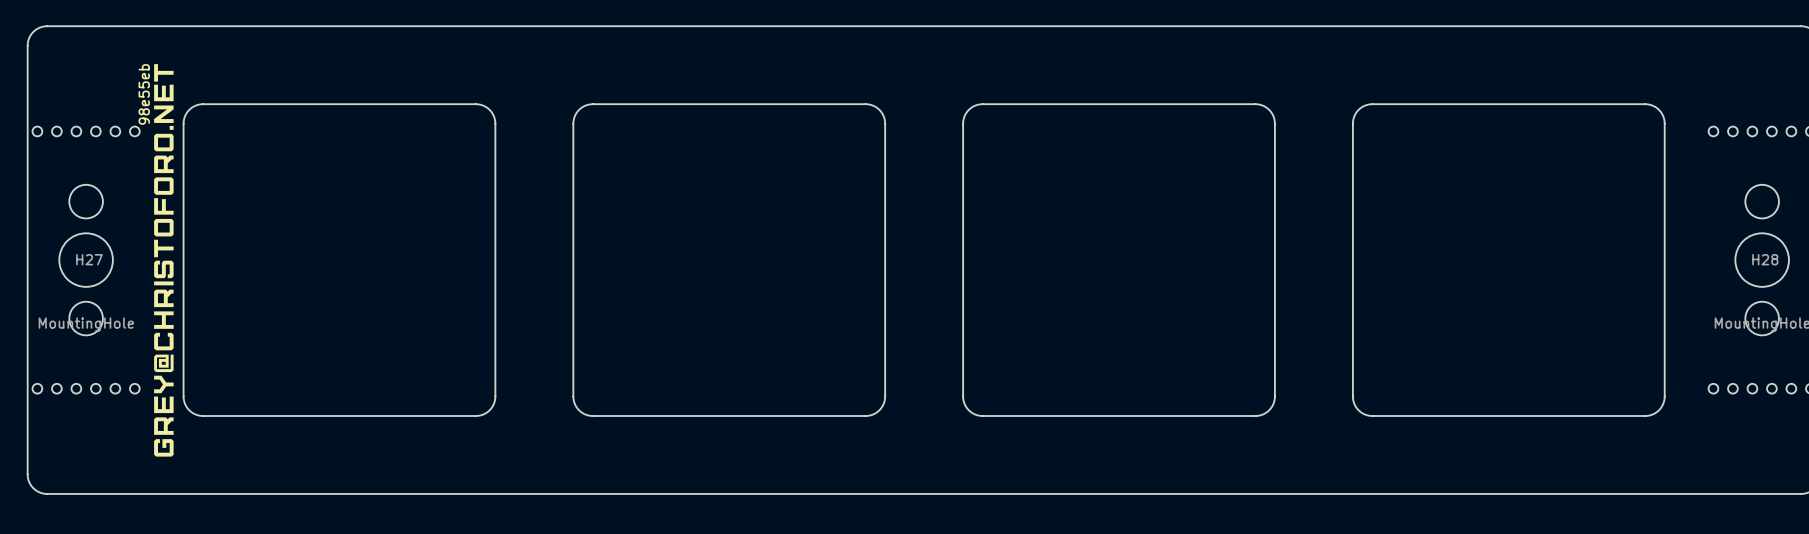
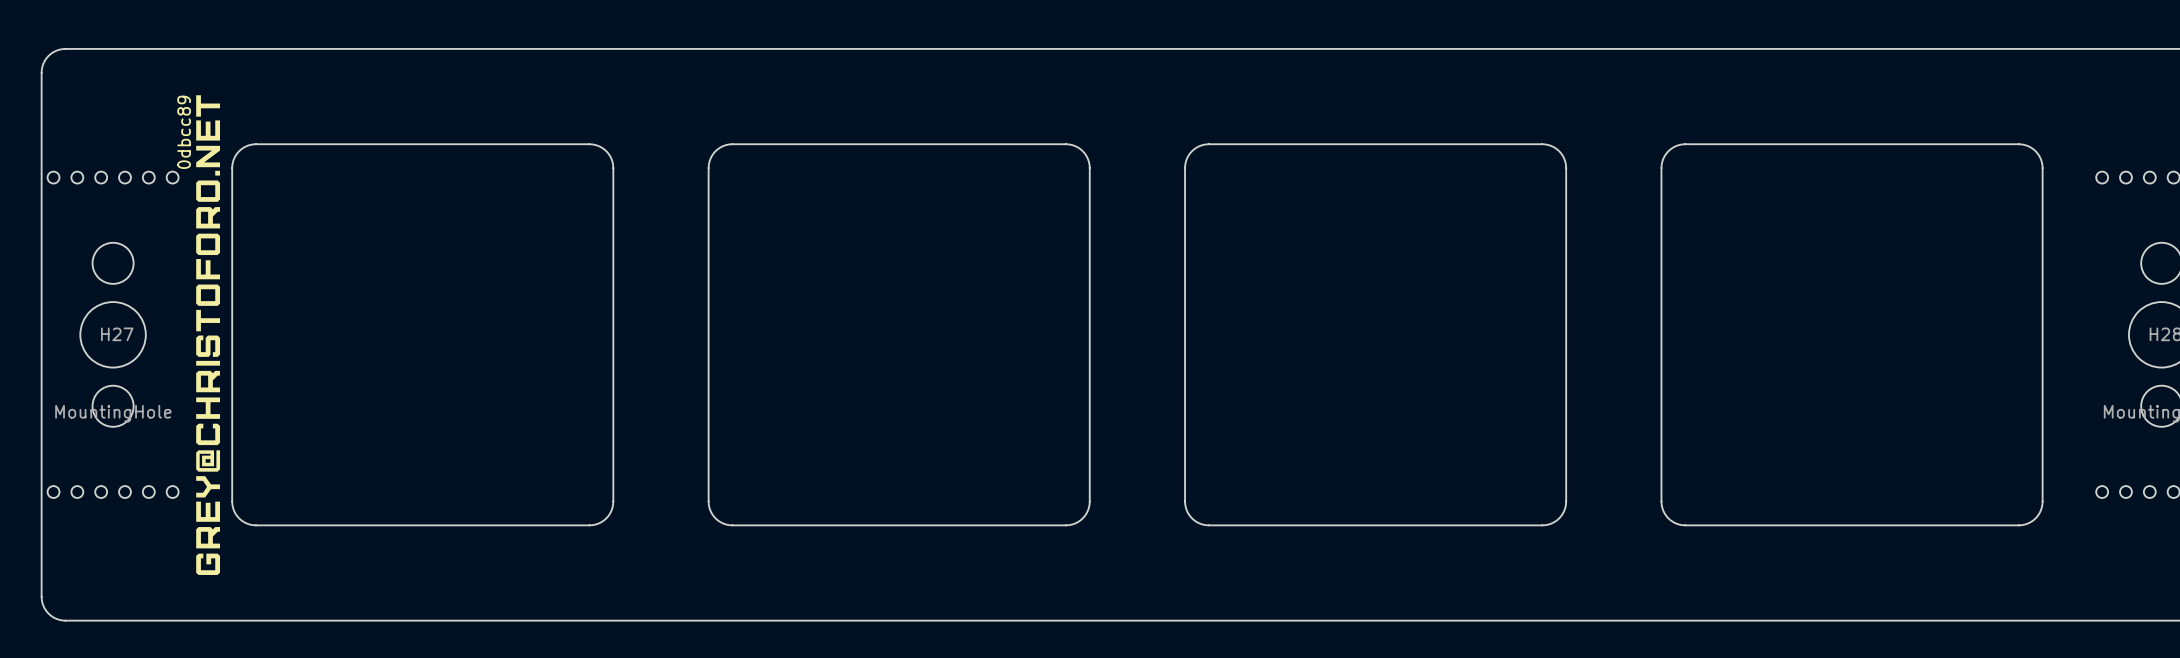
text: 98e55eb (144, 94) -> 0dbcc89 (184, 132)

